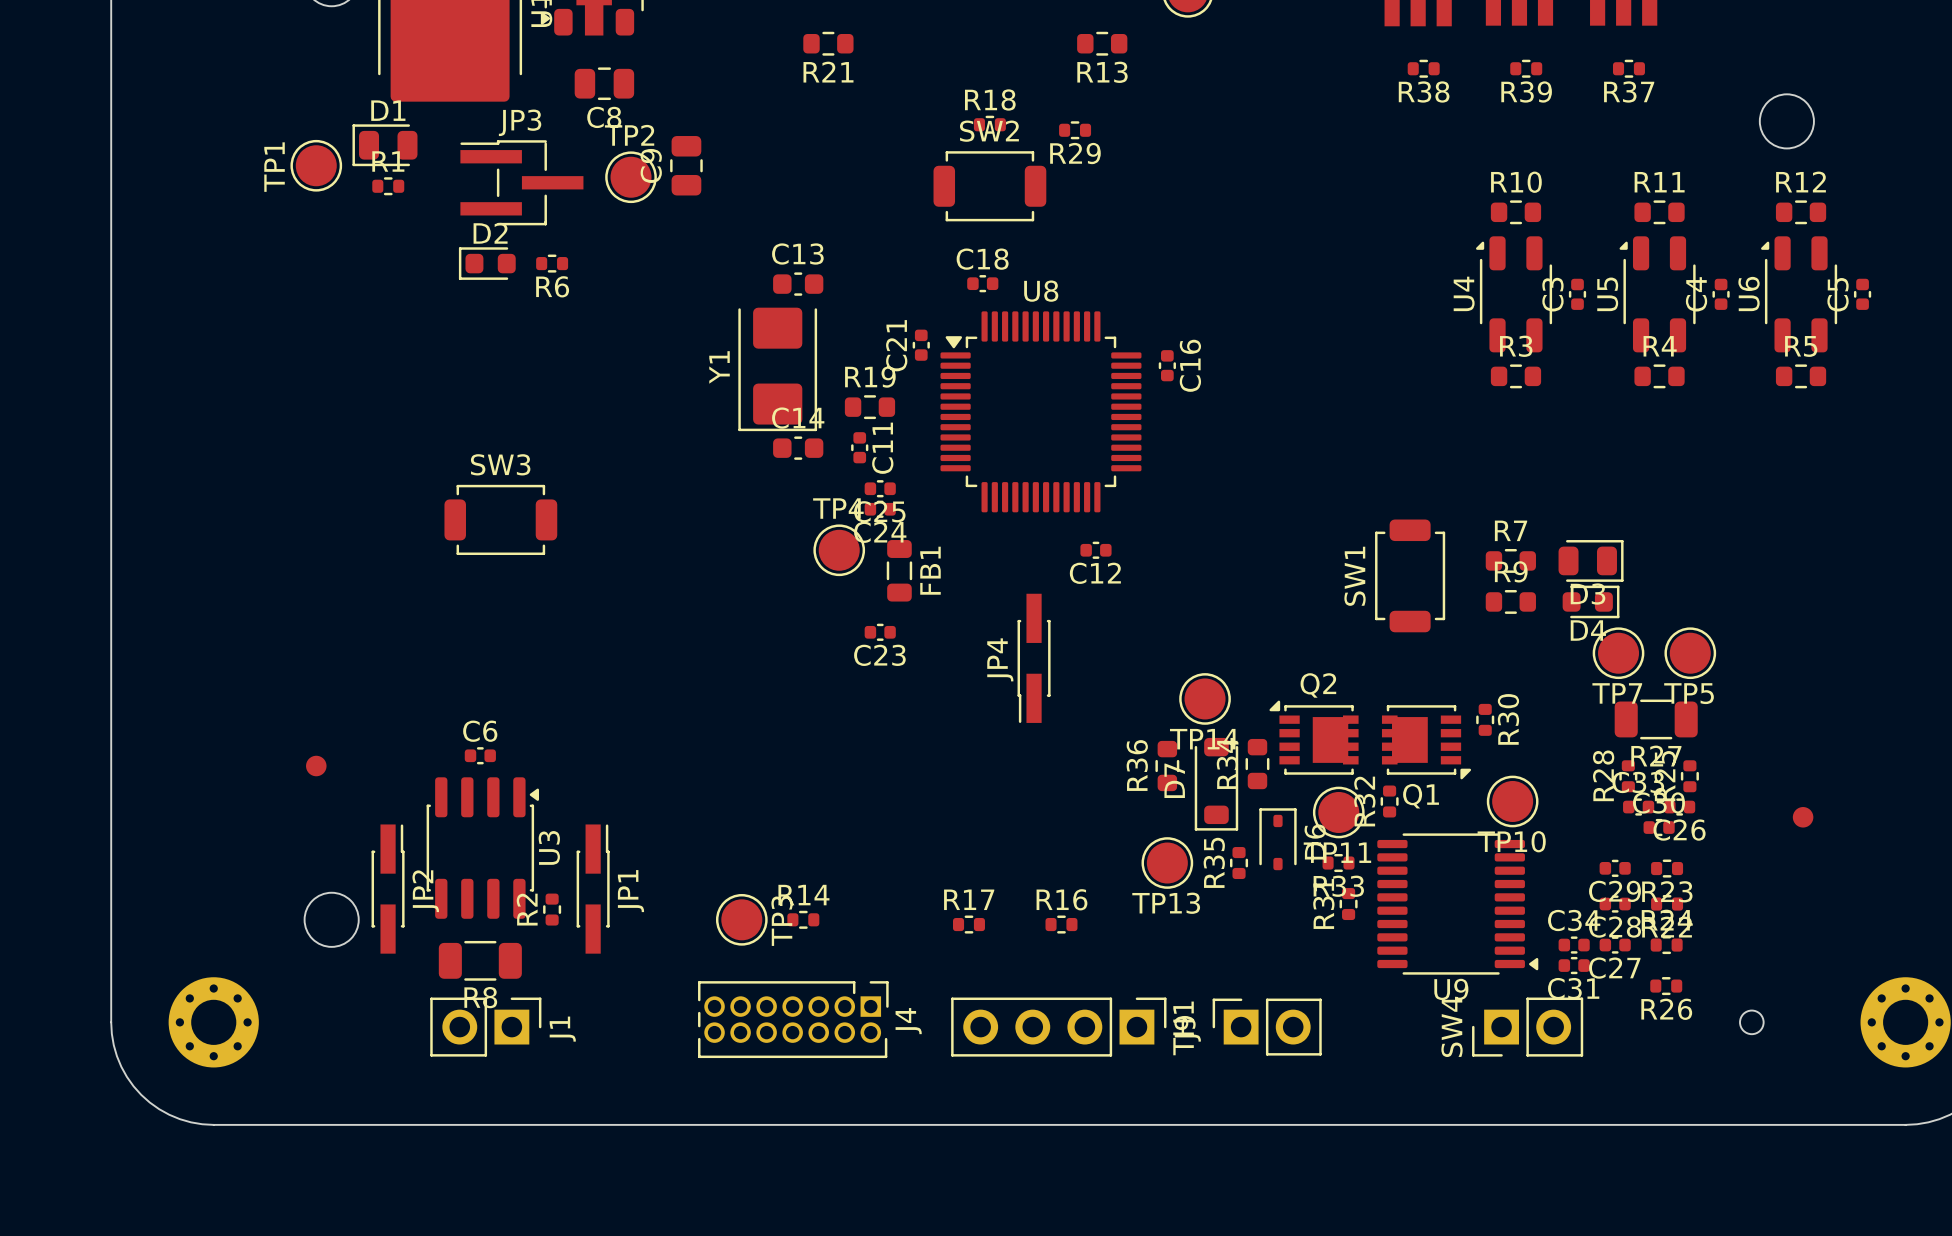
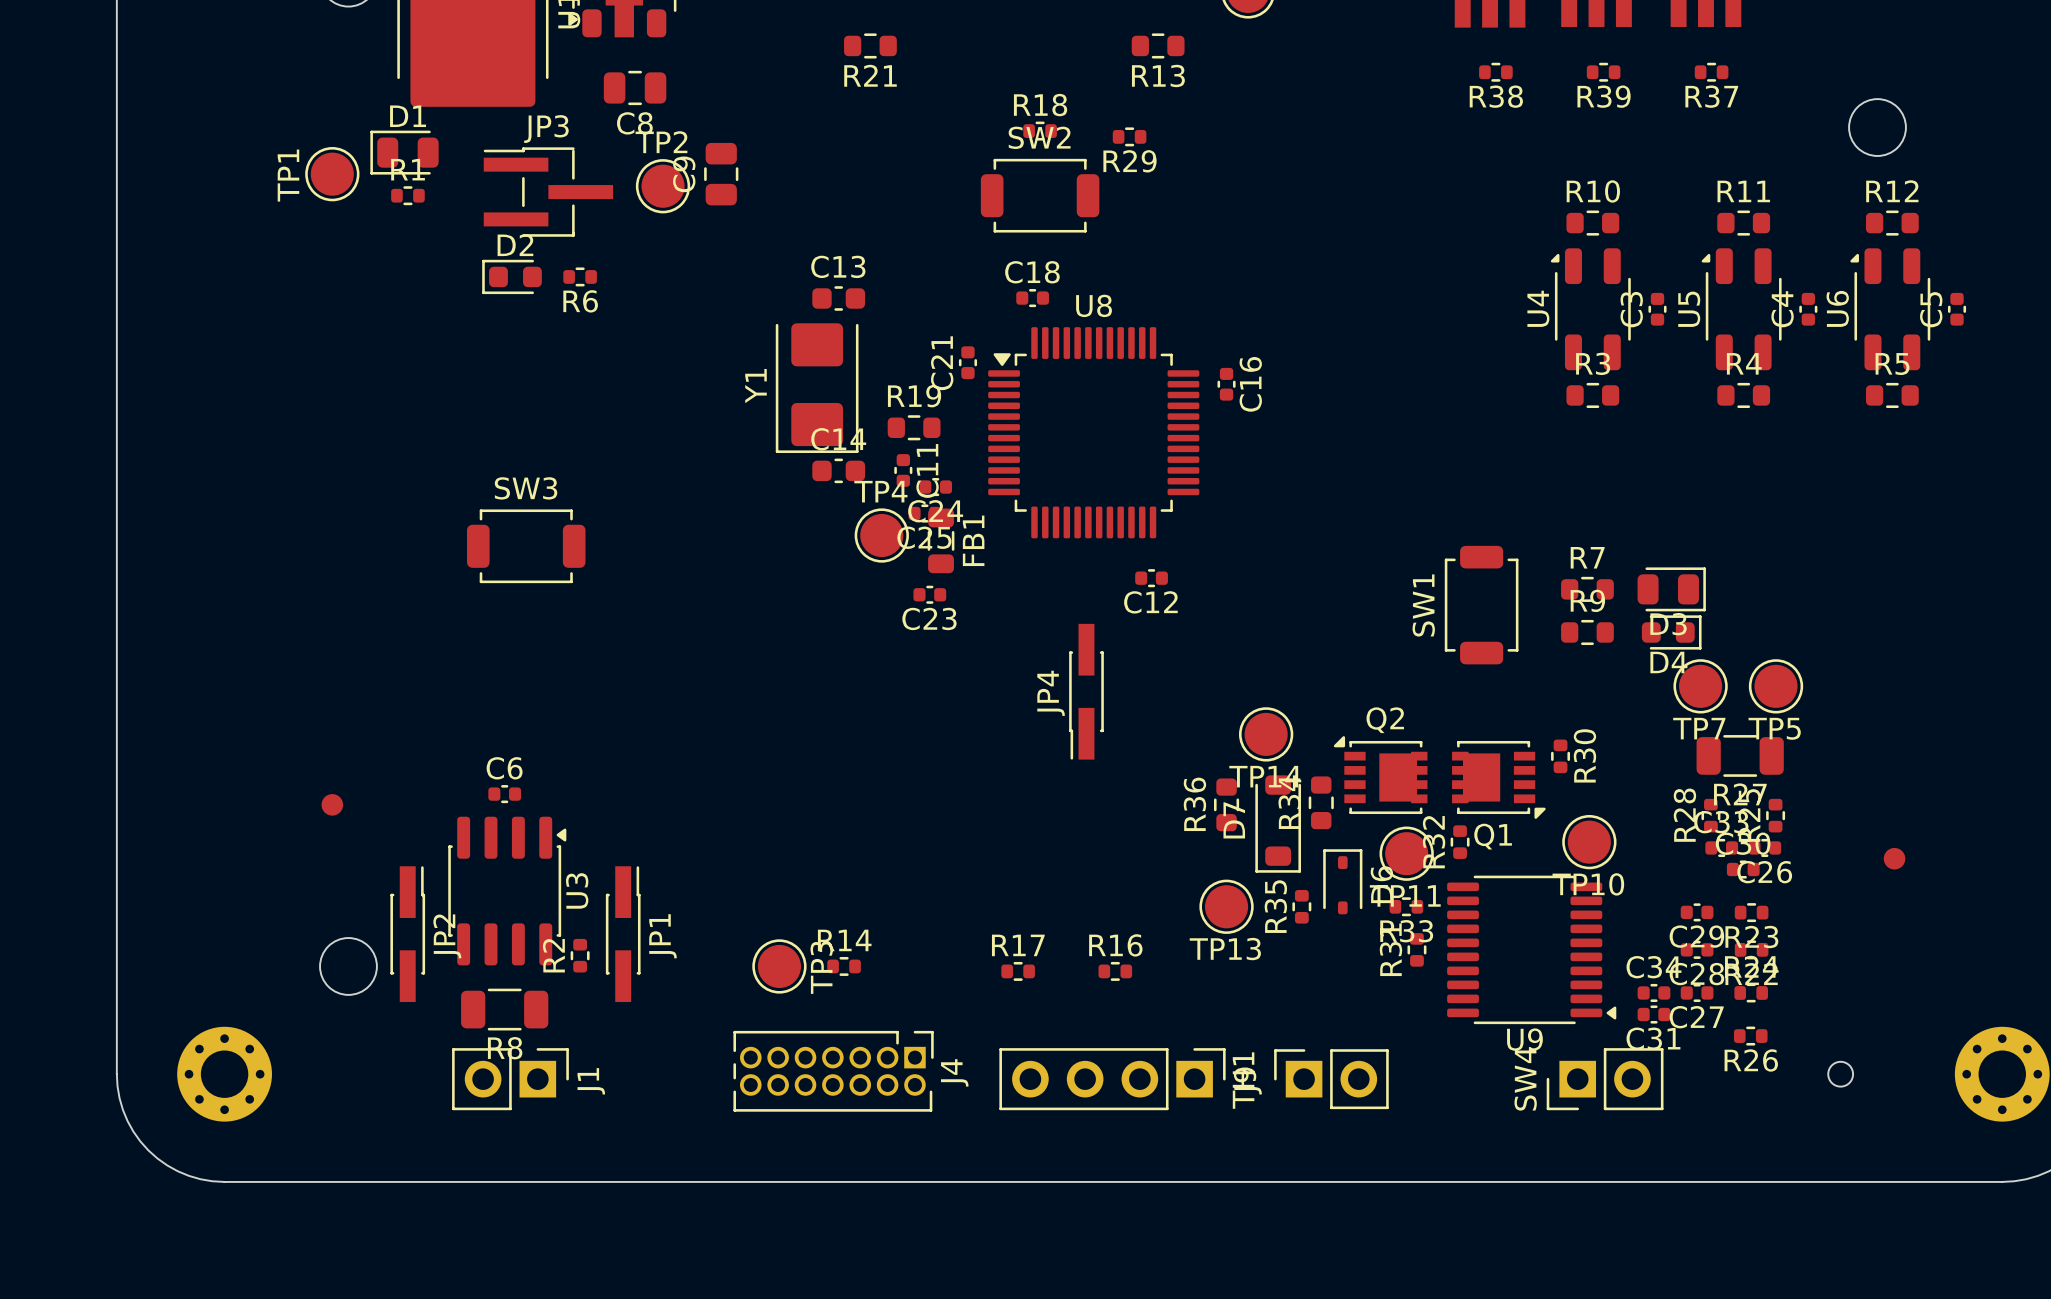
C24 position: (880, 509) -> (935, 487)
TP4 position: (839, 550) -> (881, 535)
FB1 position: (899, 570) -> (941, 540)
C23 position: (880, 632) -> (929, 594)

